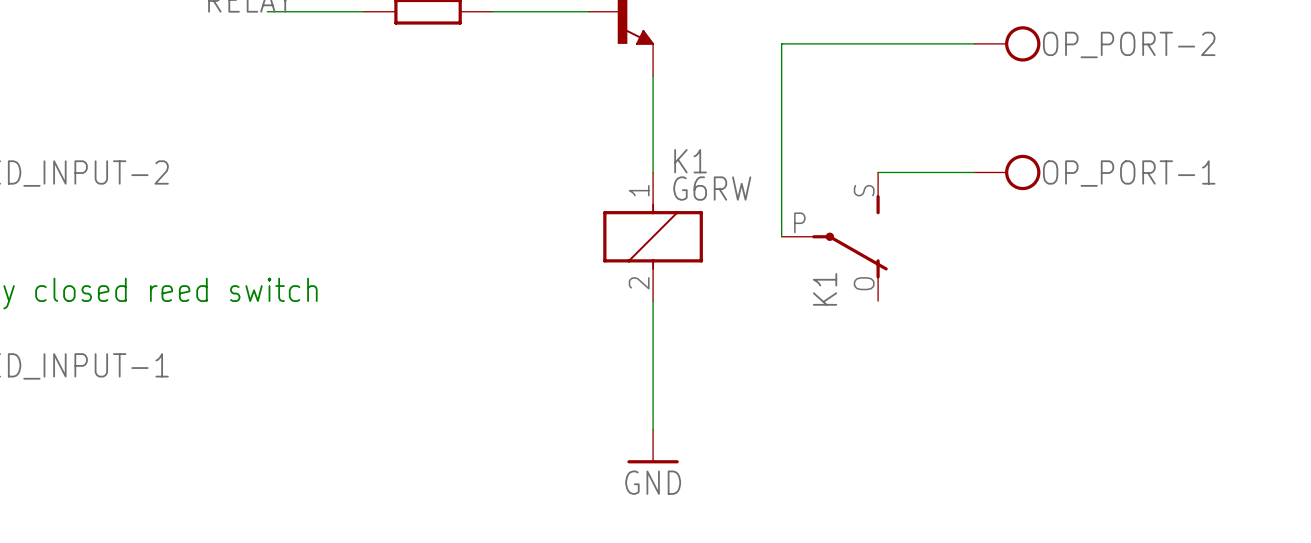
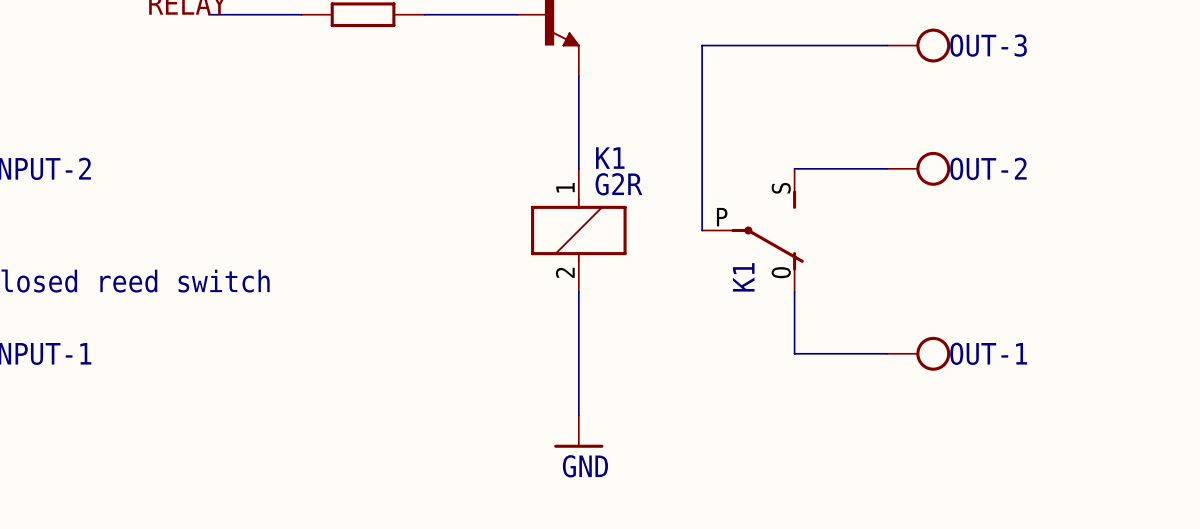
OP_PORT-2 name: OP_PORT-2 (1129, 44) -> OUT-3 (988, 45)
OP_PORT-1 name: OP_PORT-1 (1129, 173) -> OUT-2 (988, 168)
K1 value: G6RW (712, 188) -> G2R (618, 184)
wire: none -> (794, 292) (794, 353) (887, 353)
OUT-1: none -> (918, 353)

